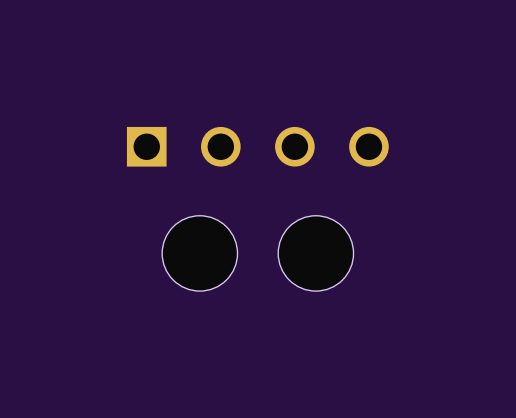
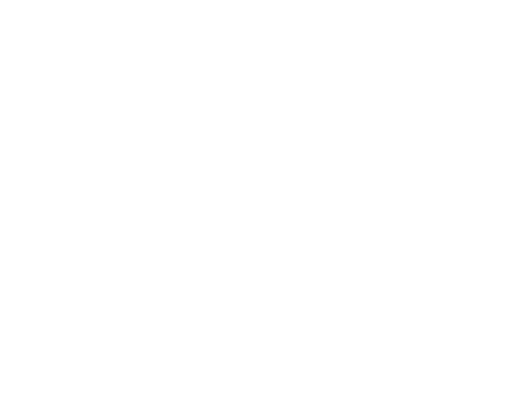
part: (257, 209) -> none

